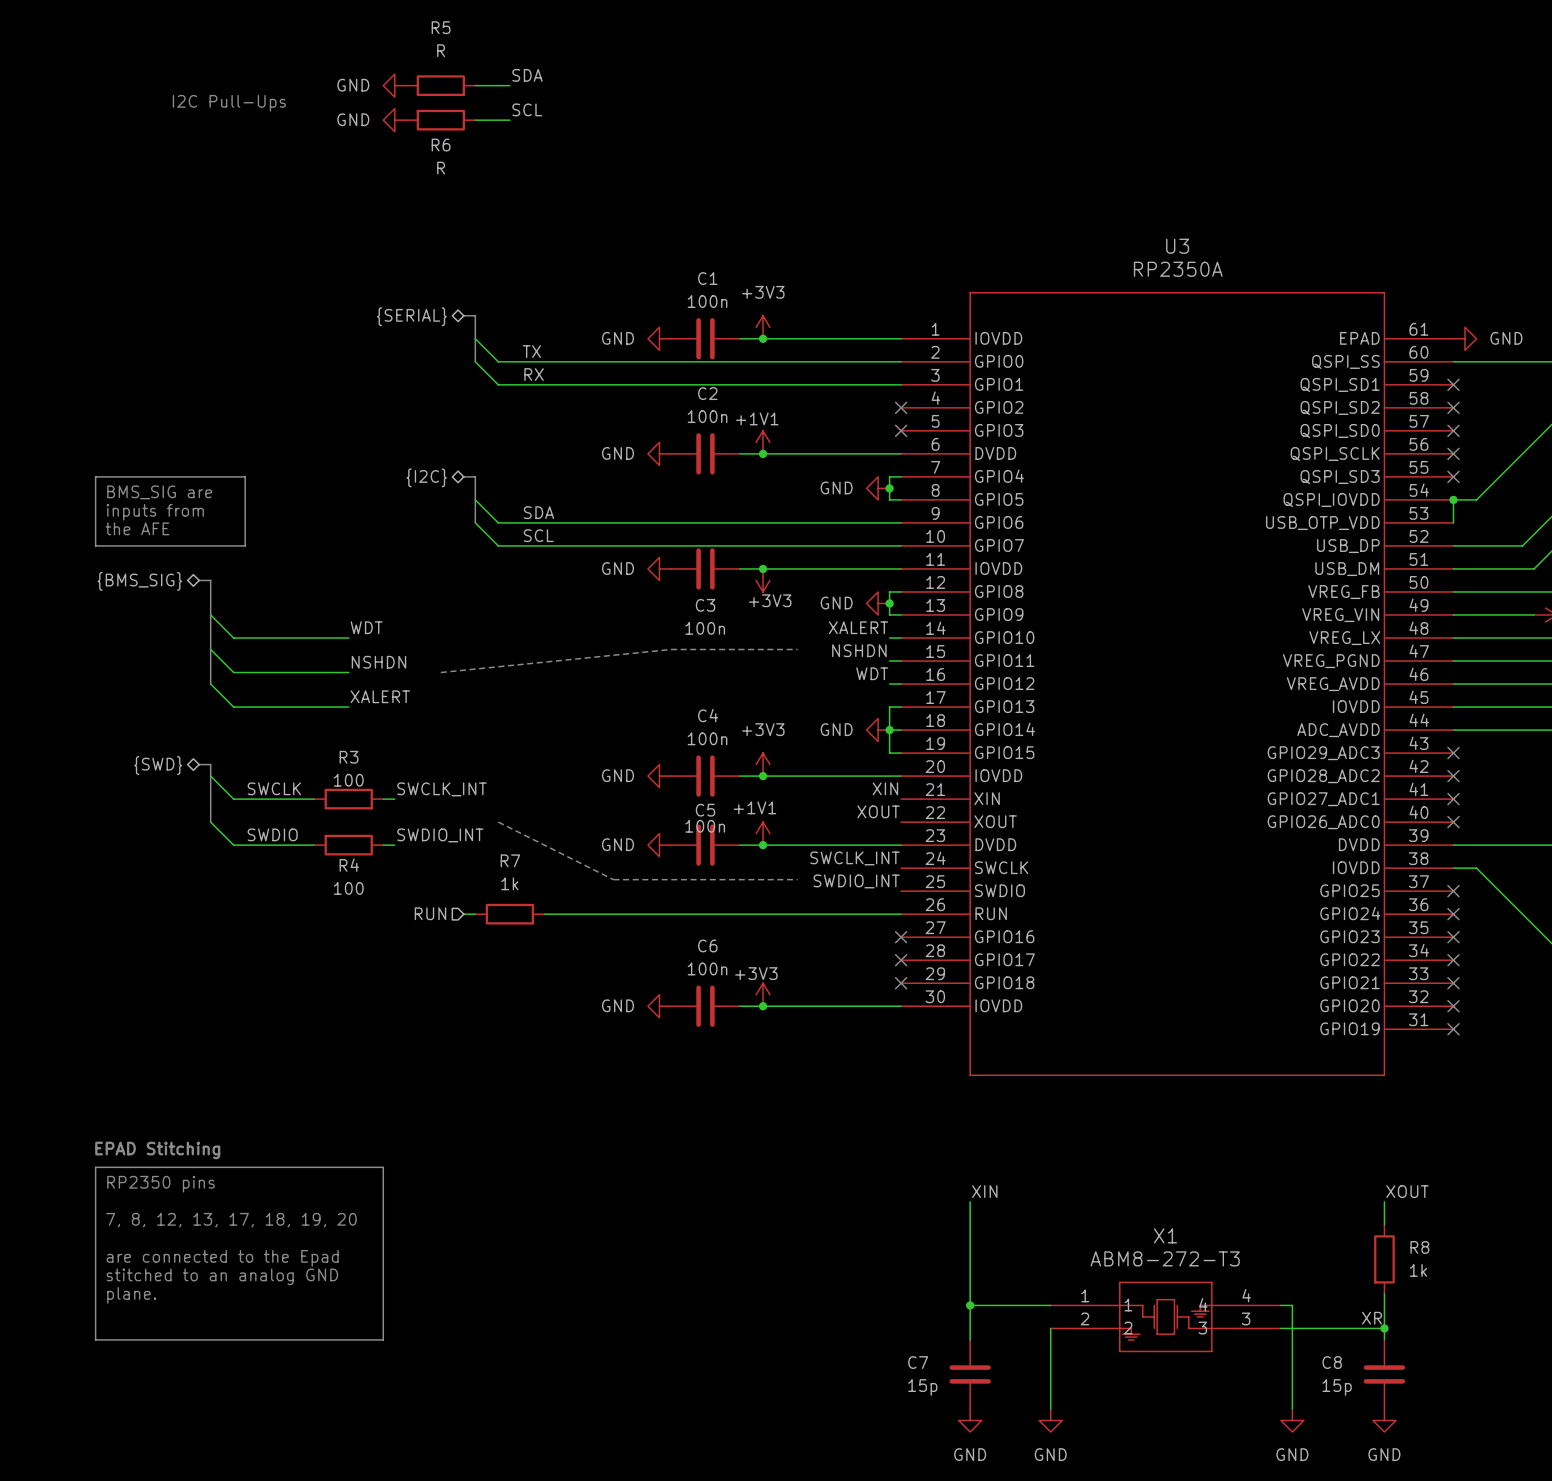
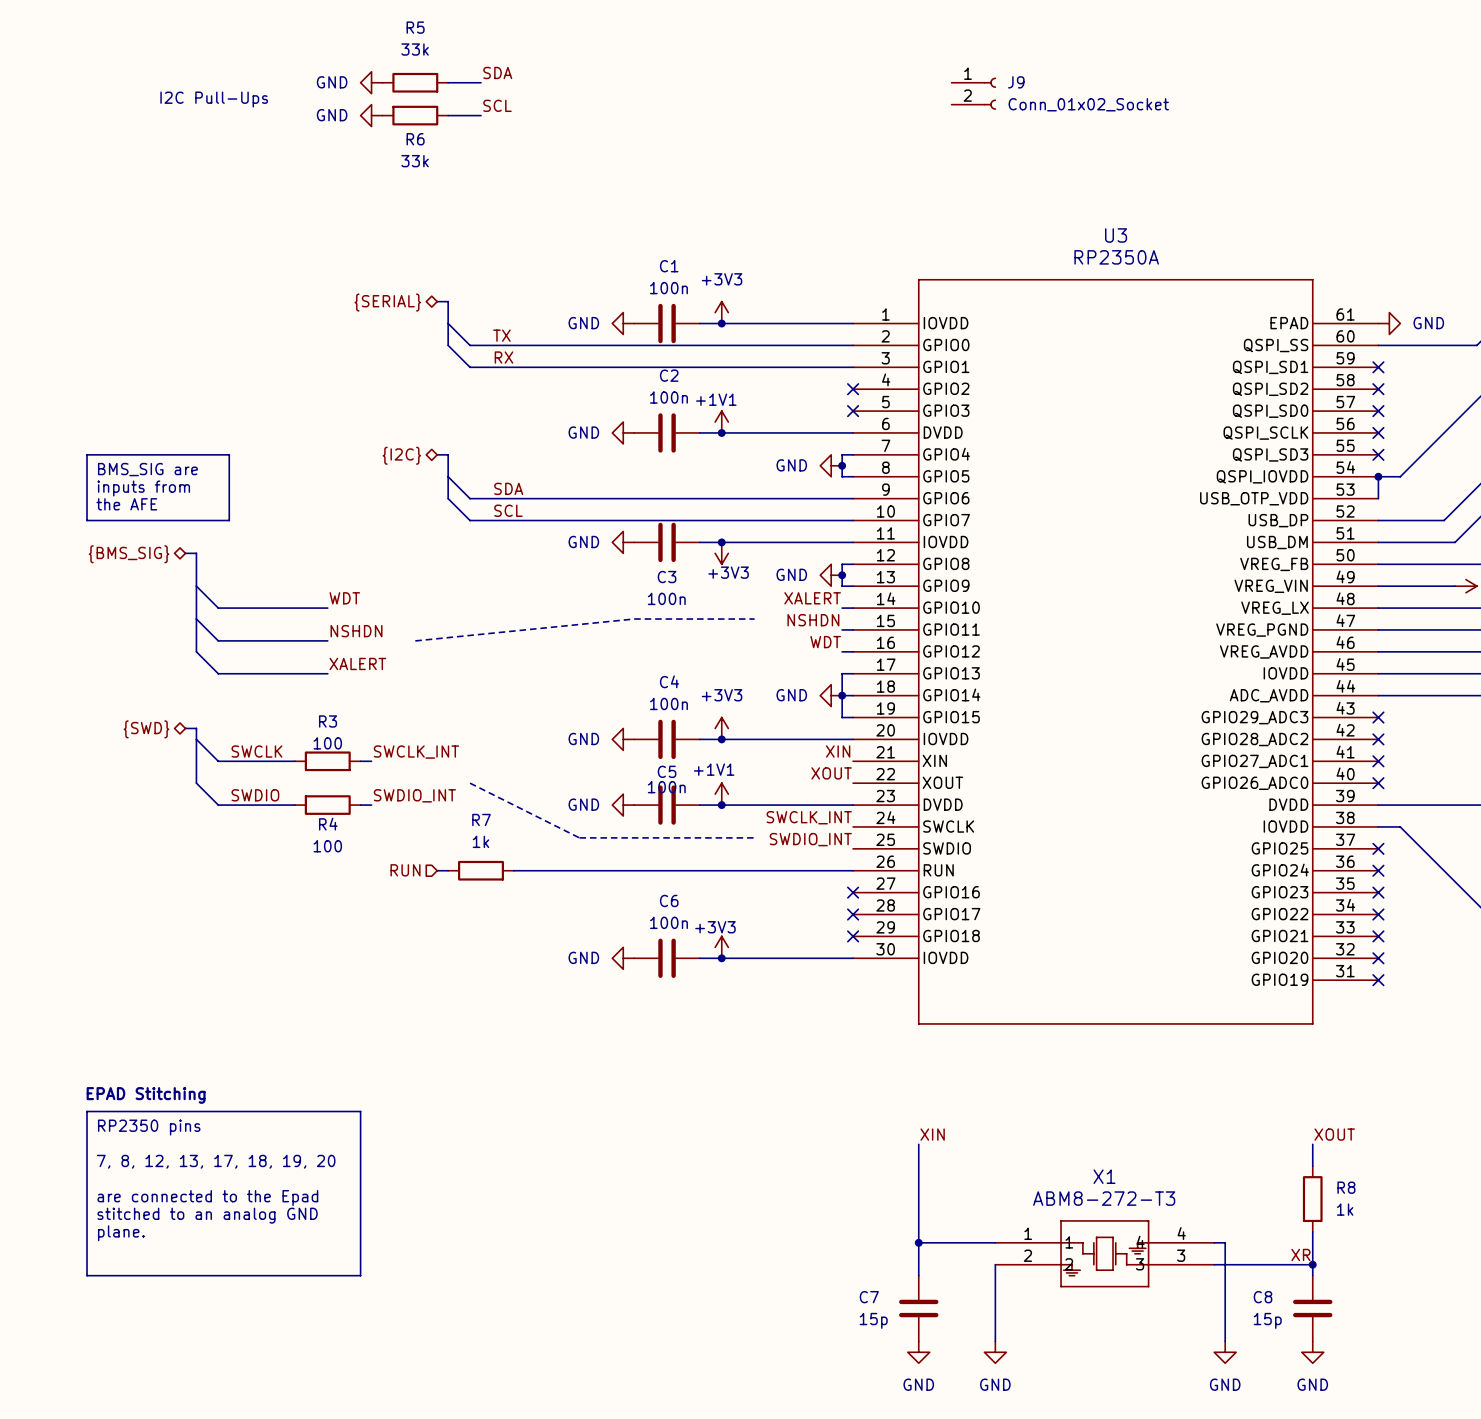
R5 value: R (441, 50) -> 33k (415, 49)
J9: none -> Conn_01x02_Socket (973, 93)
R6 value: R (441, 168) -> 33k (415, 161)

